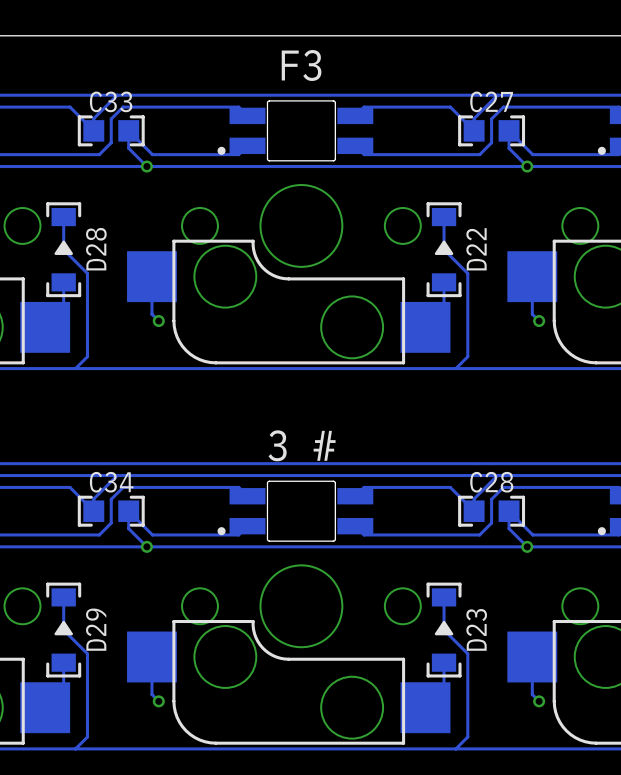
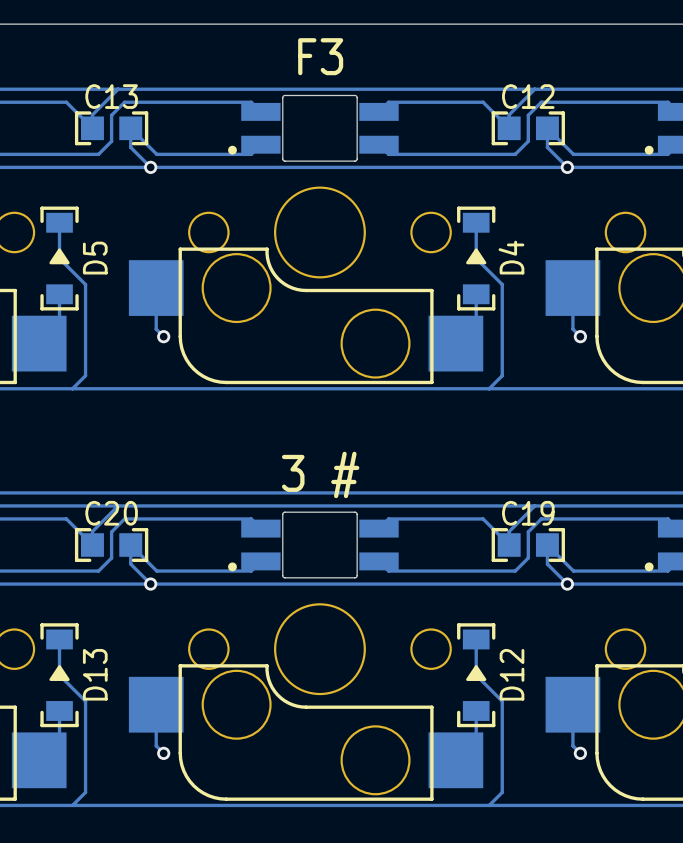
C33 name: C33 (111, 101) -> C13 (111, 96)
C27 name: C27 (491, 101) -> C12 (528, 96)
D28 name: D28 (96, 249) -> D5 (95, 258)
D22 name: D22 (476, 249) -> D4 (511, 257)
C34 name: C34 (111, 482) -> C20 (111, 513)
C28 name: C28 (491, 482) -> C19 (528, 513)
D29 name: D29 (96, 629) -> D13 (95, 674)
D23 name: D23 (476, 629) -> D12 (511, 674)

